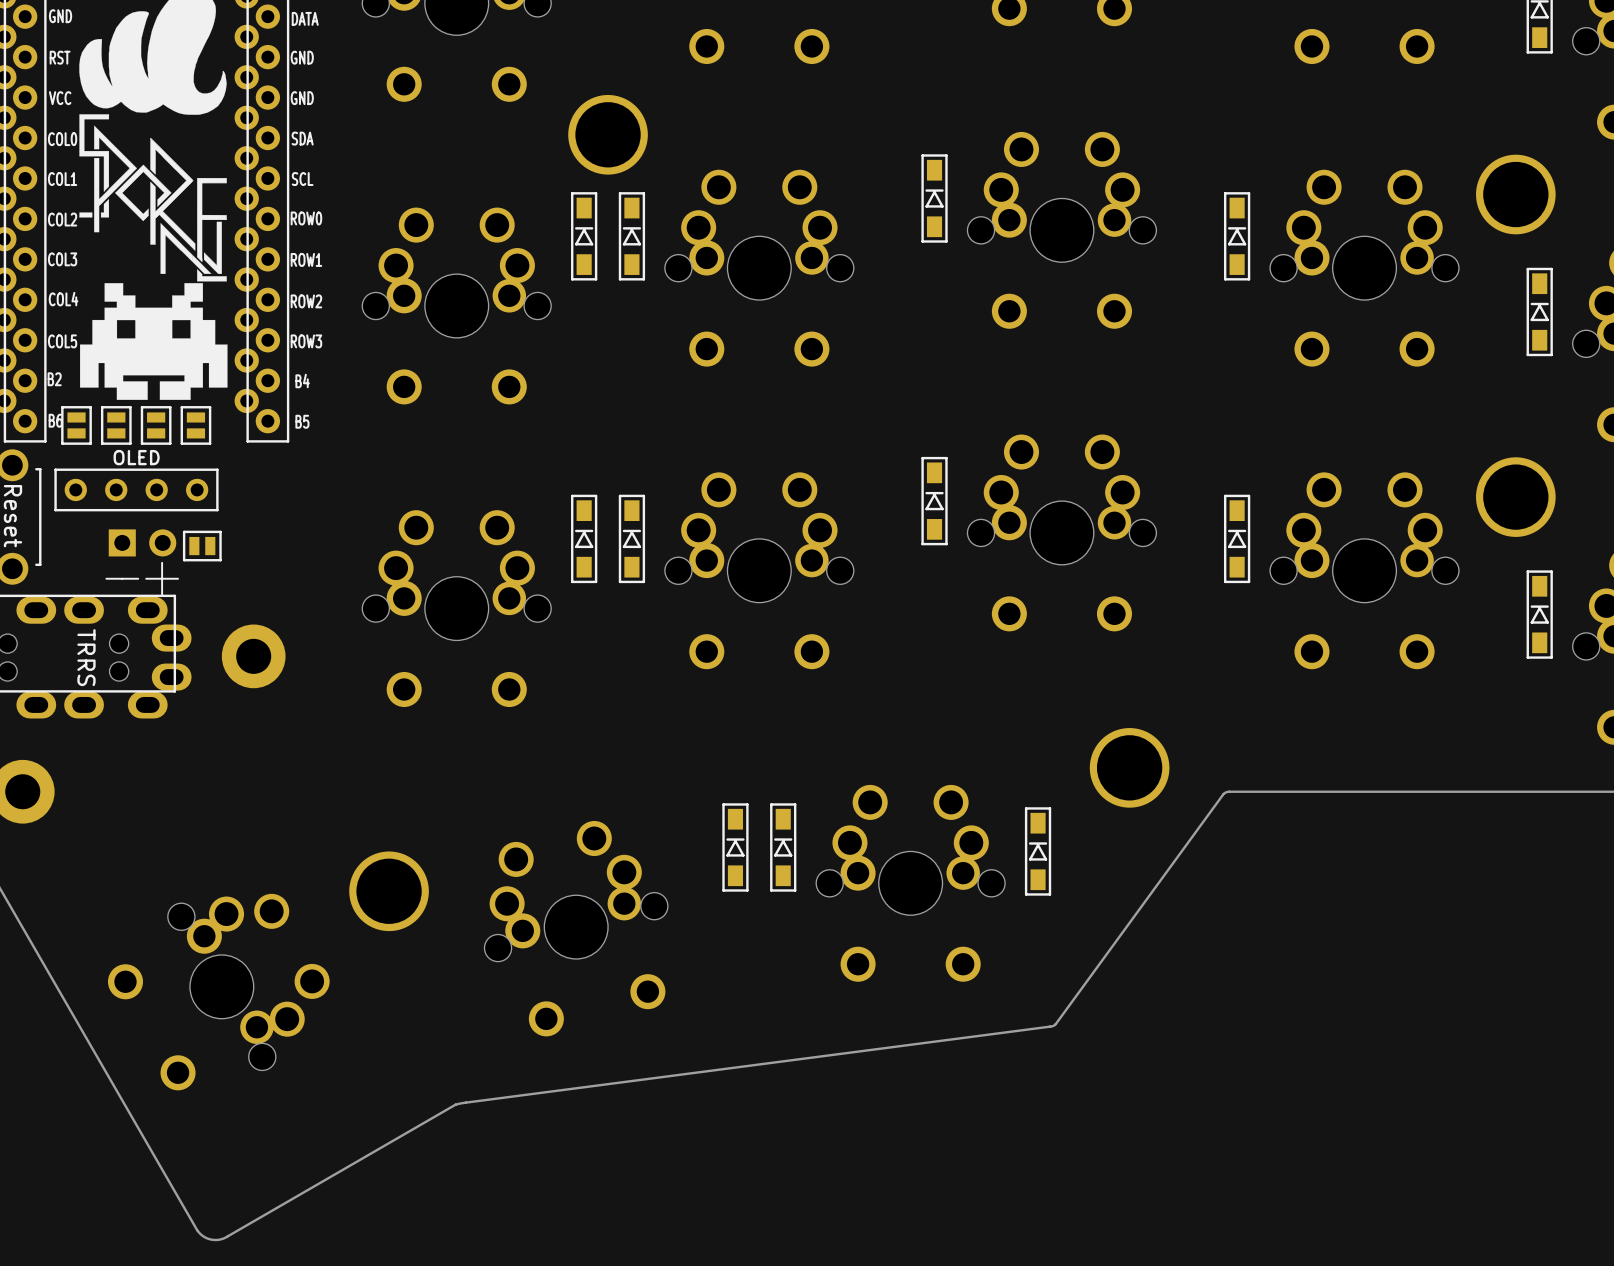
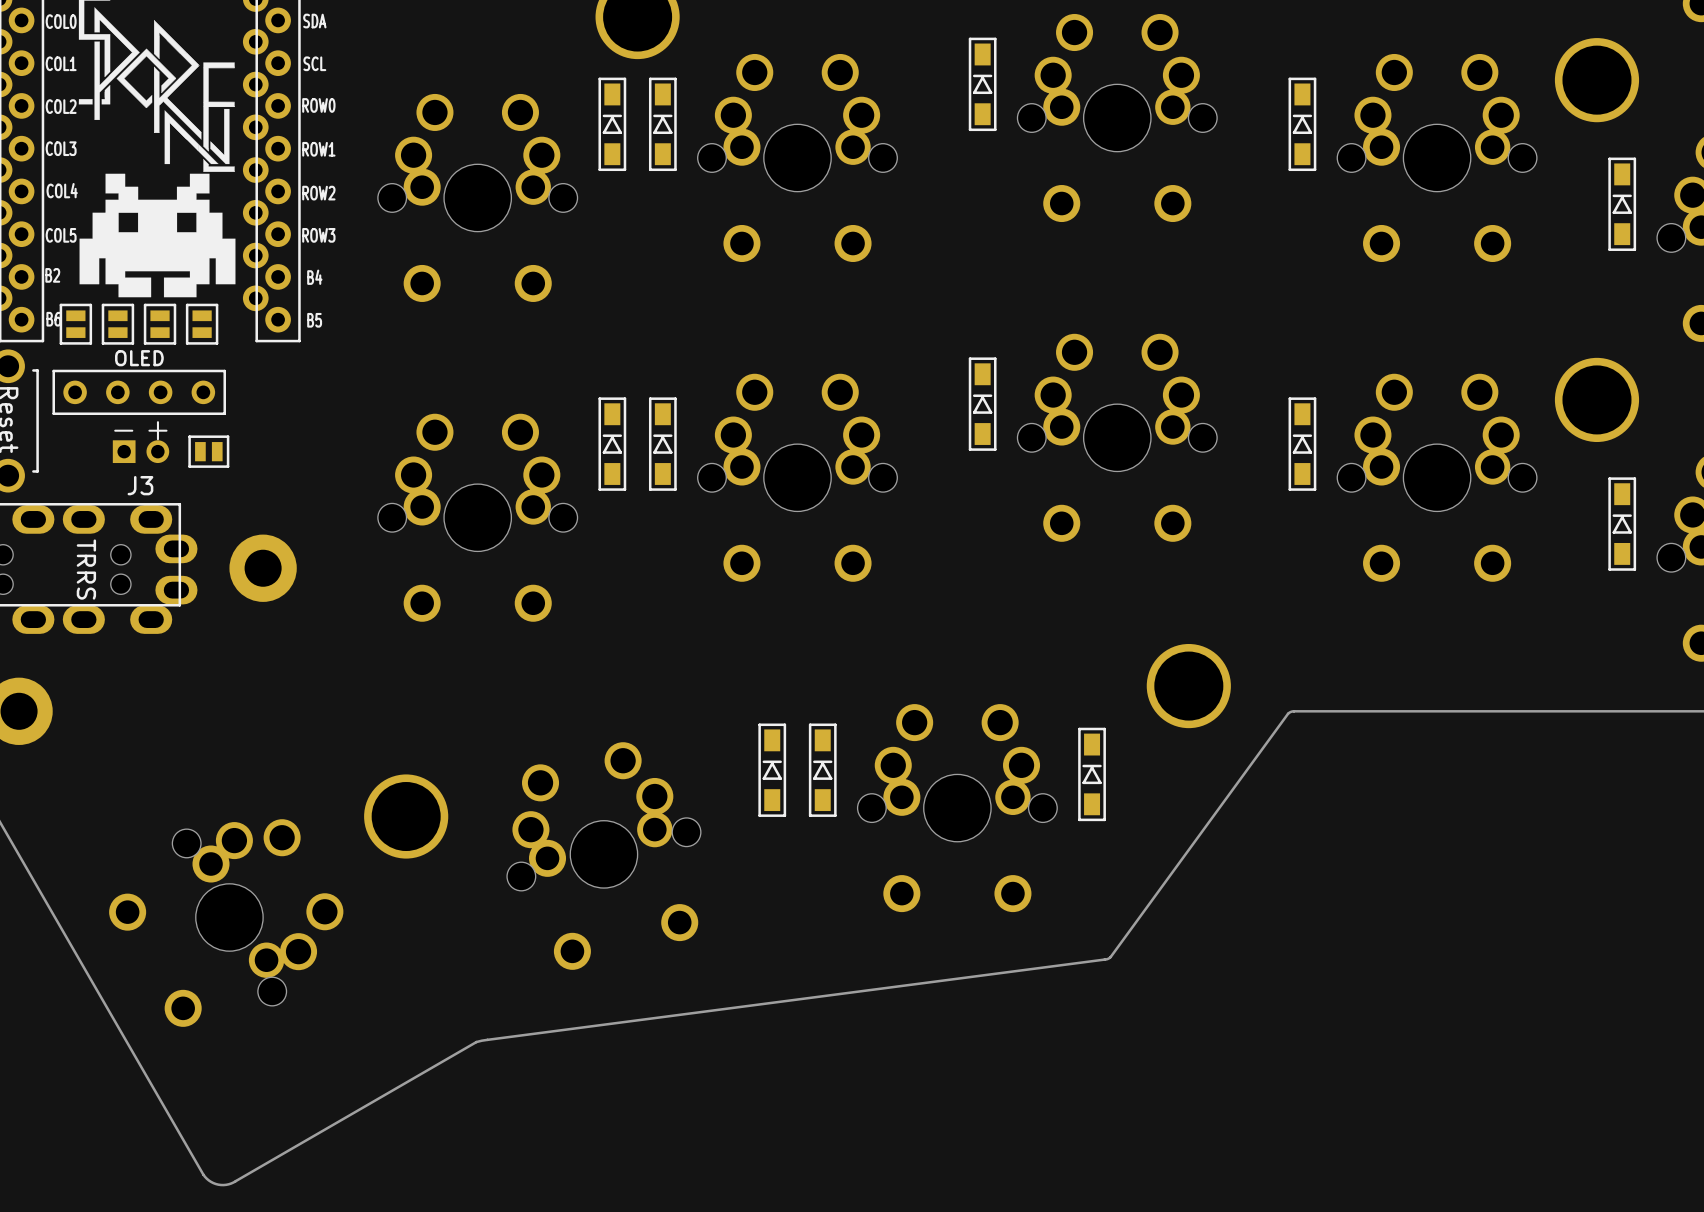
part: none -> (141, 442)
part: (142, 562) -> none

